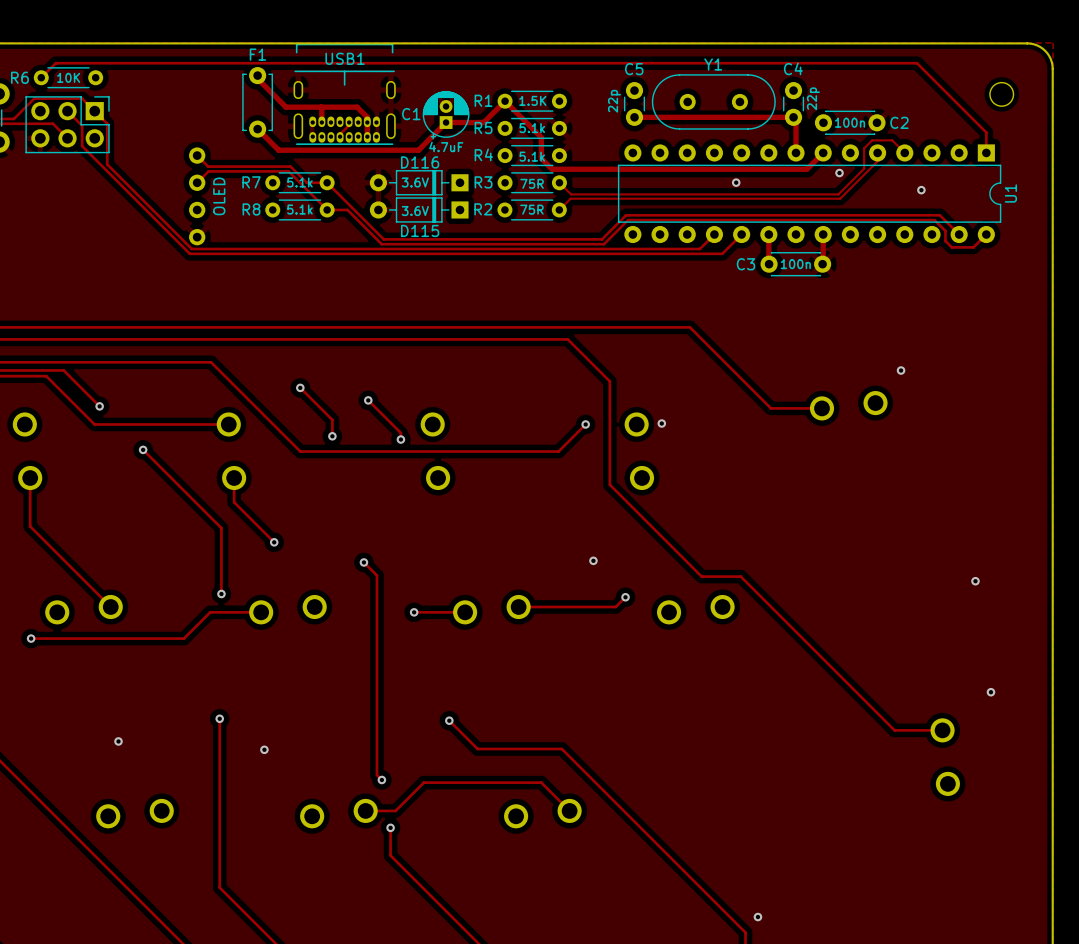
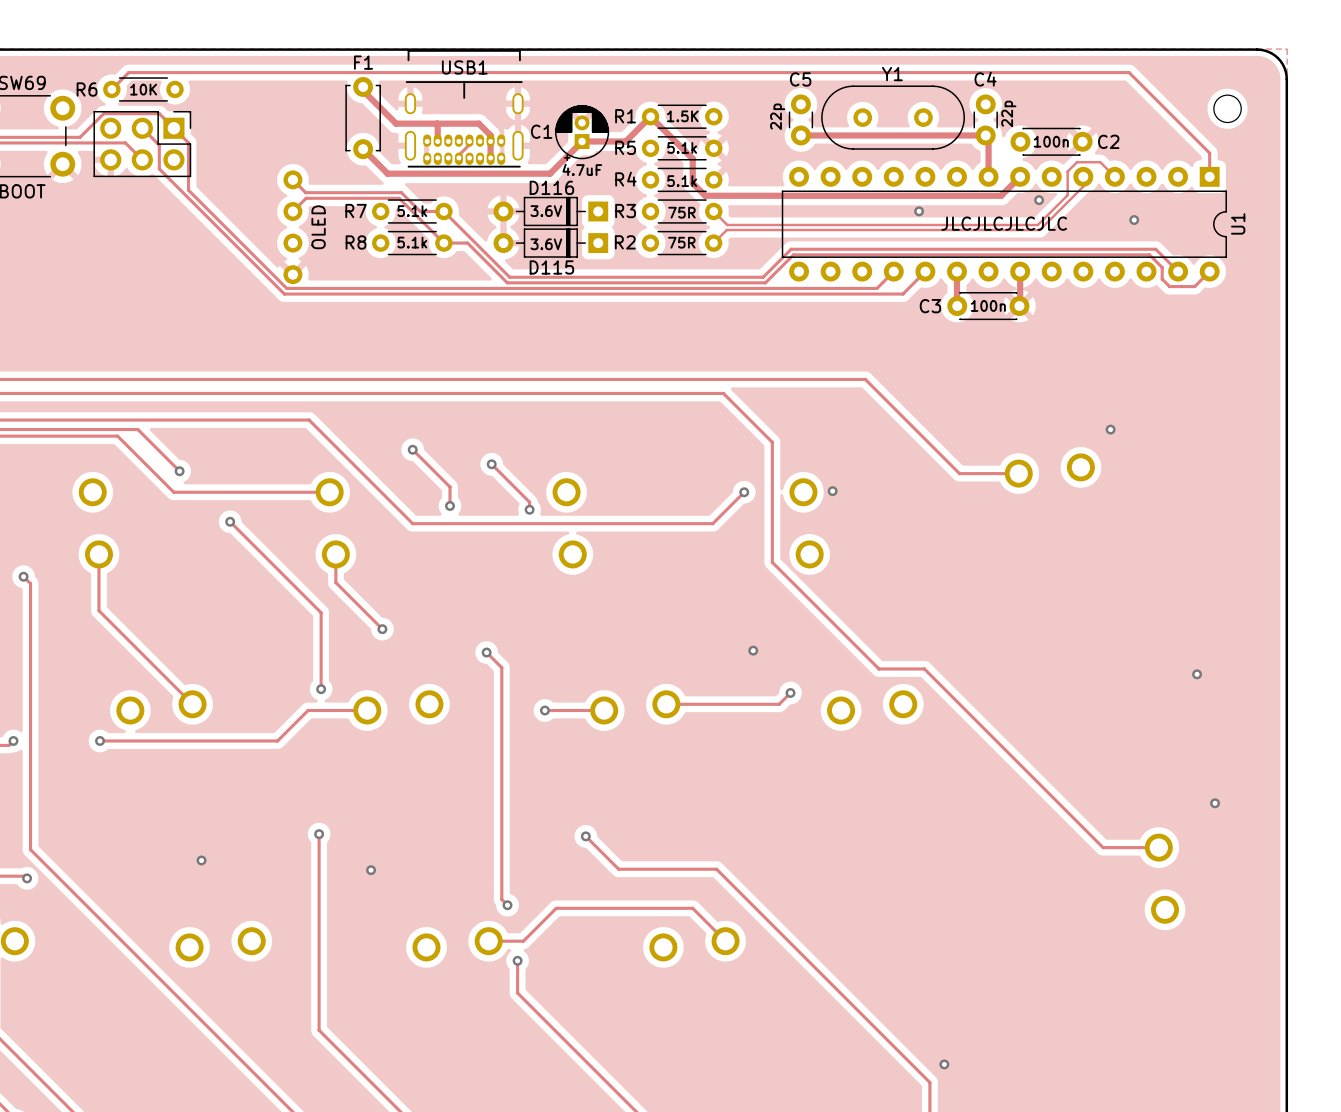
text: none -> JLCJLCJLCJLC (1004, 223)

